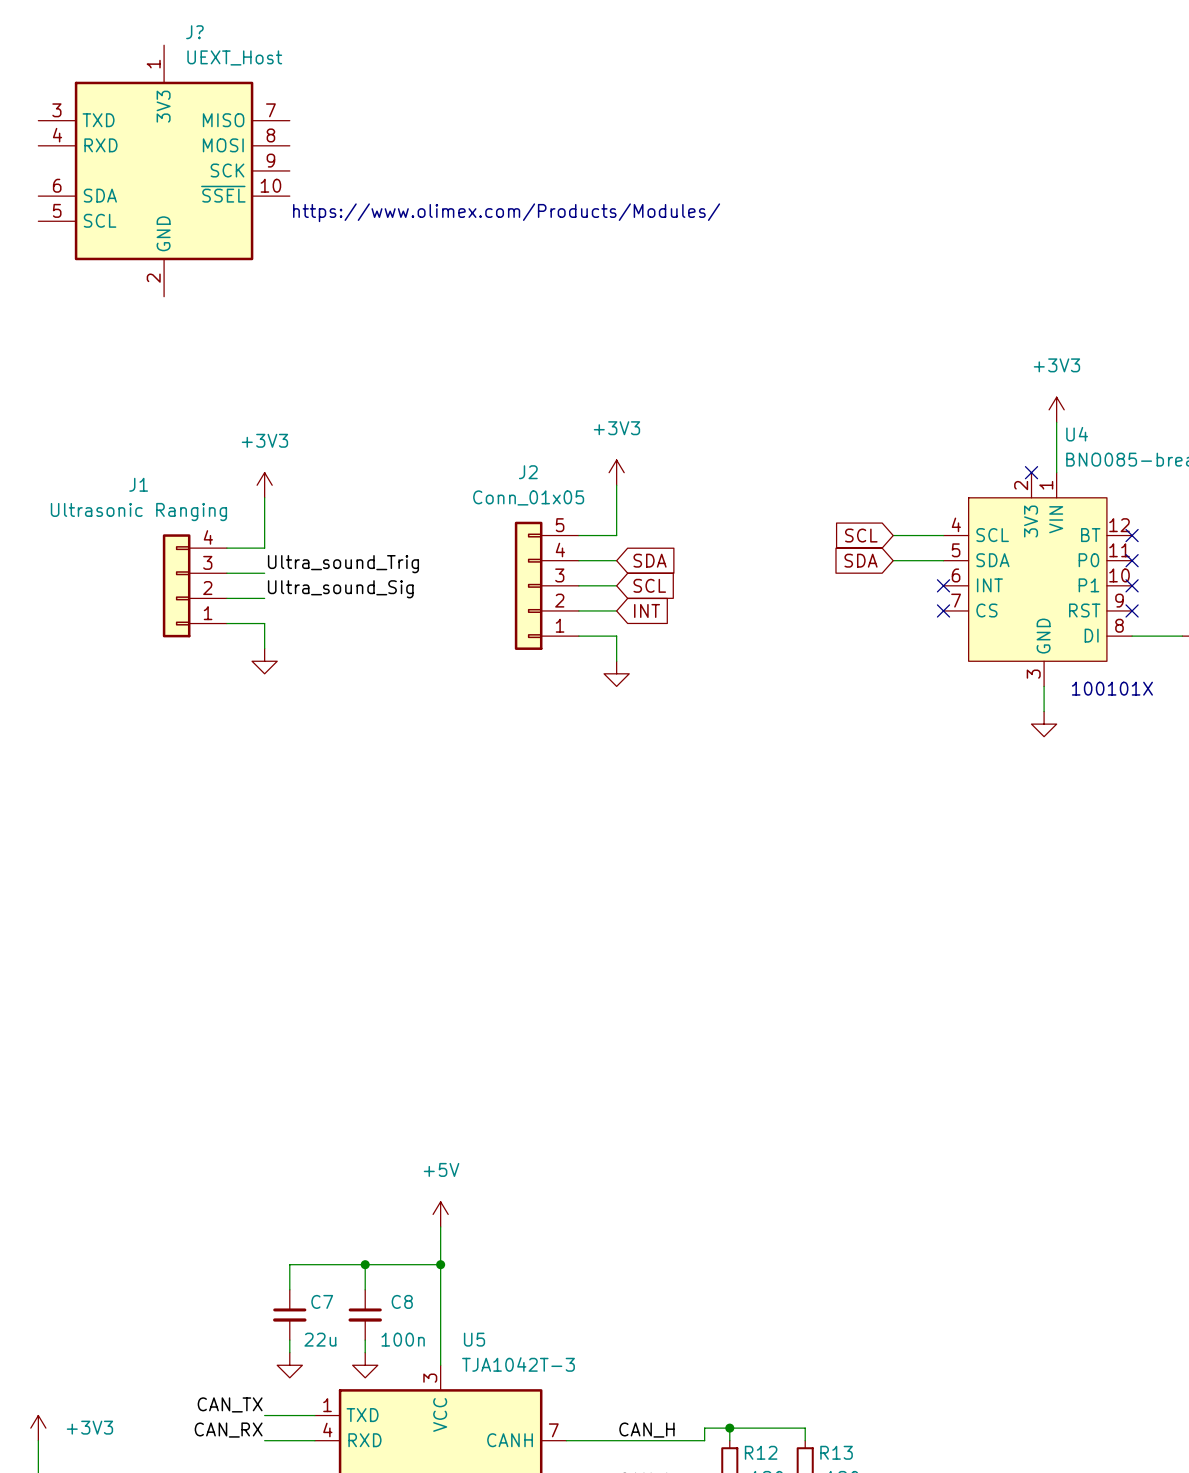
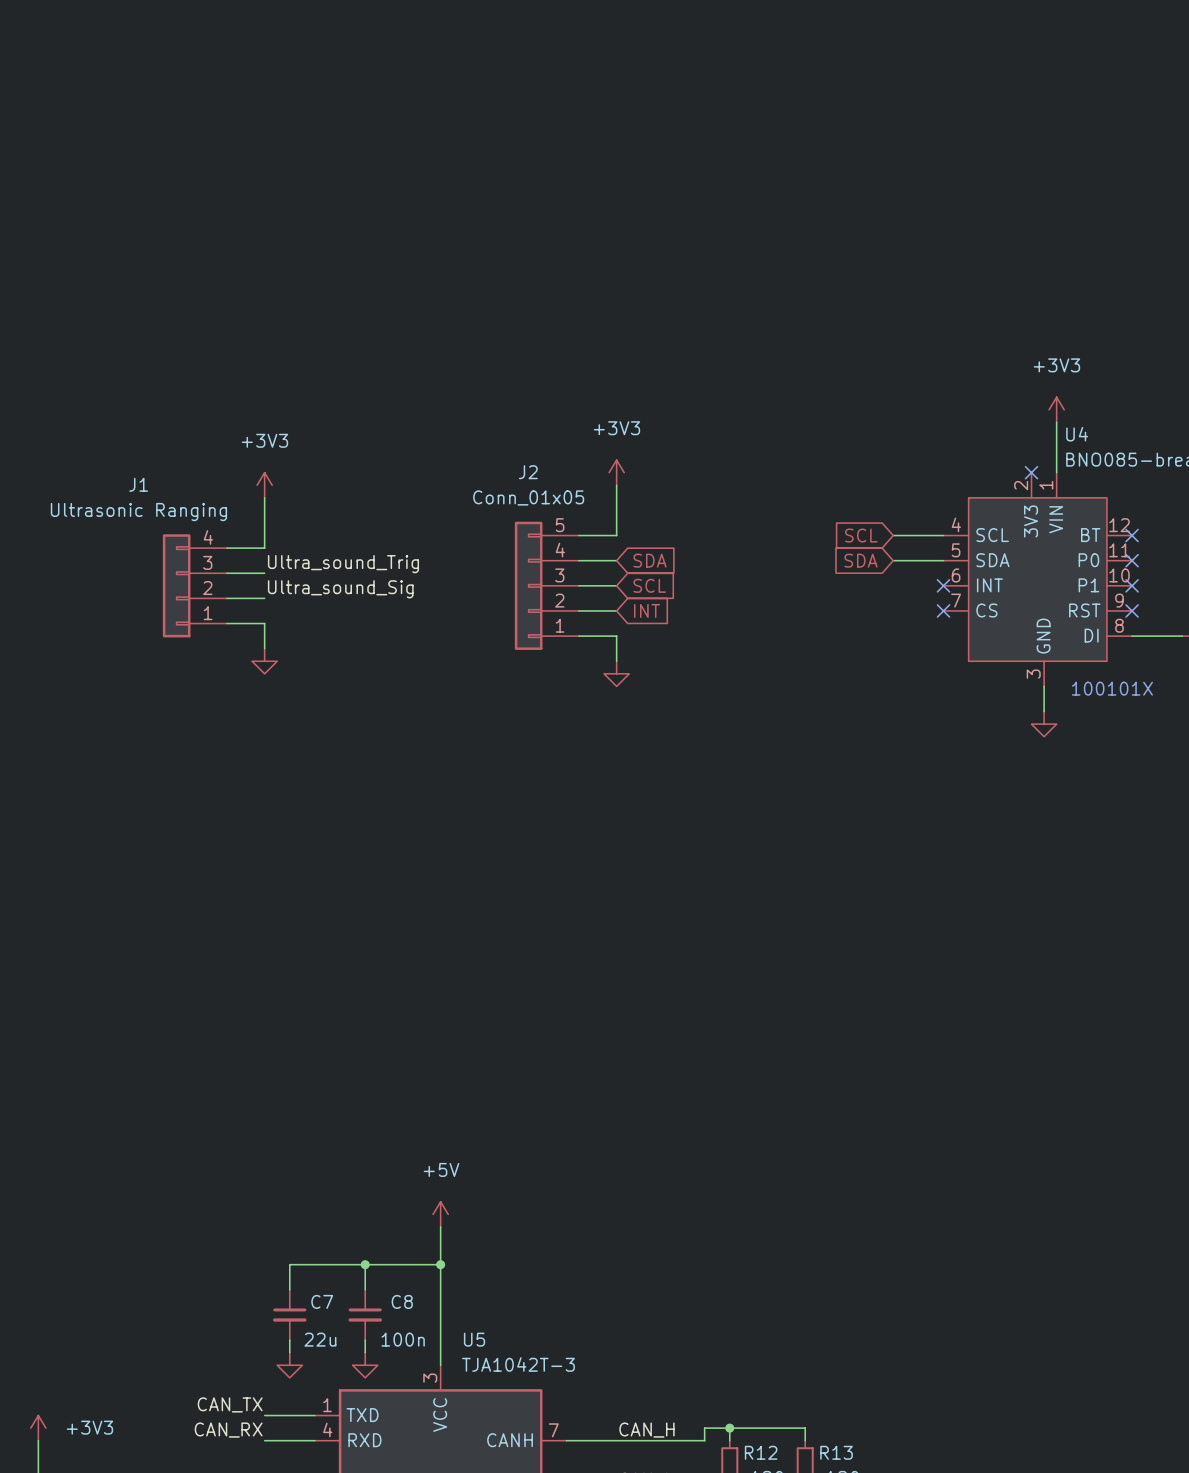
J?: UEXT_Host (164, 170) -> none
text: https://www.olimex.com/Products/Modules/ (506, 212) -> none

